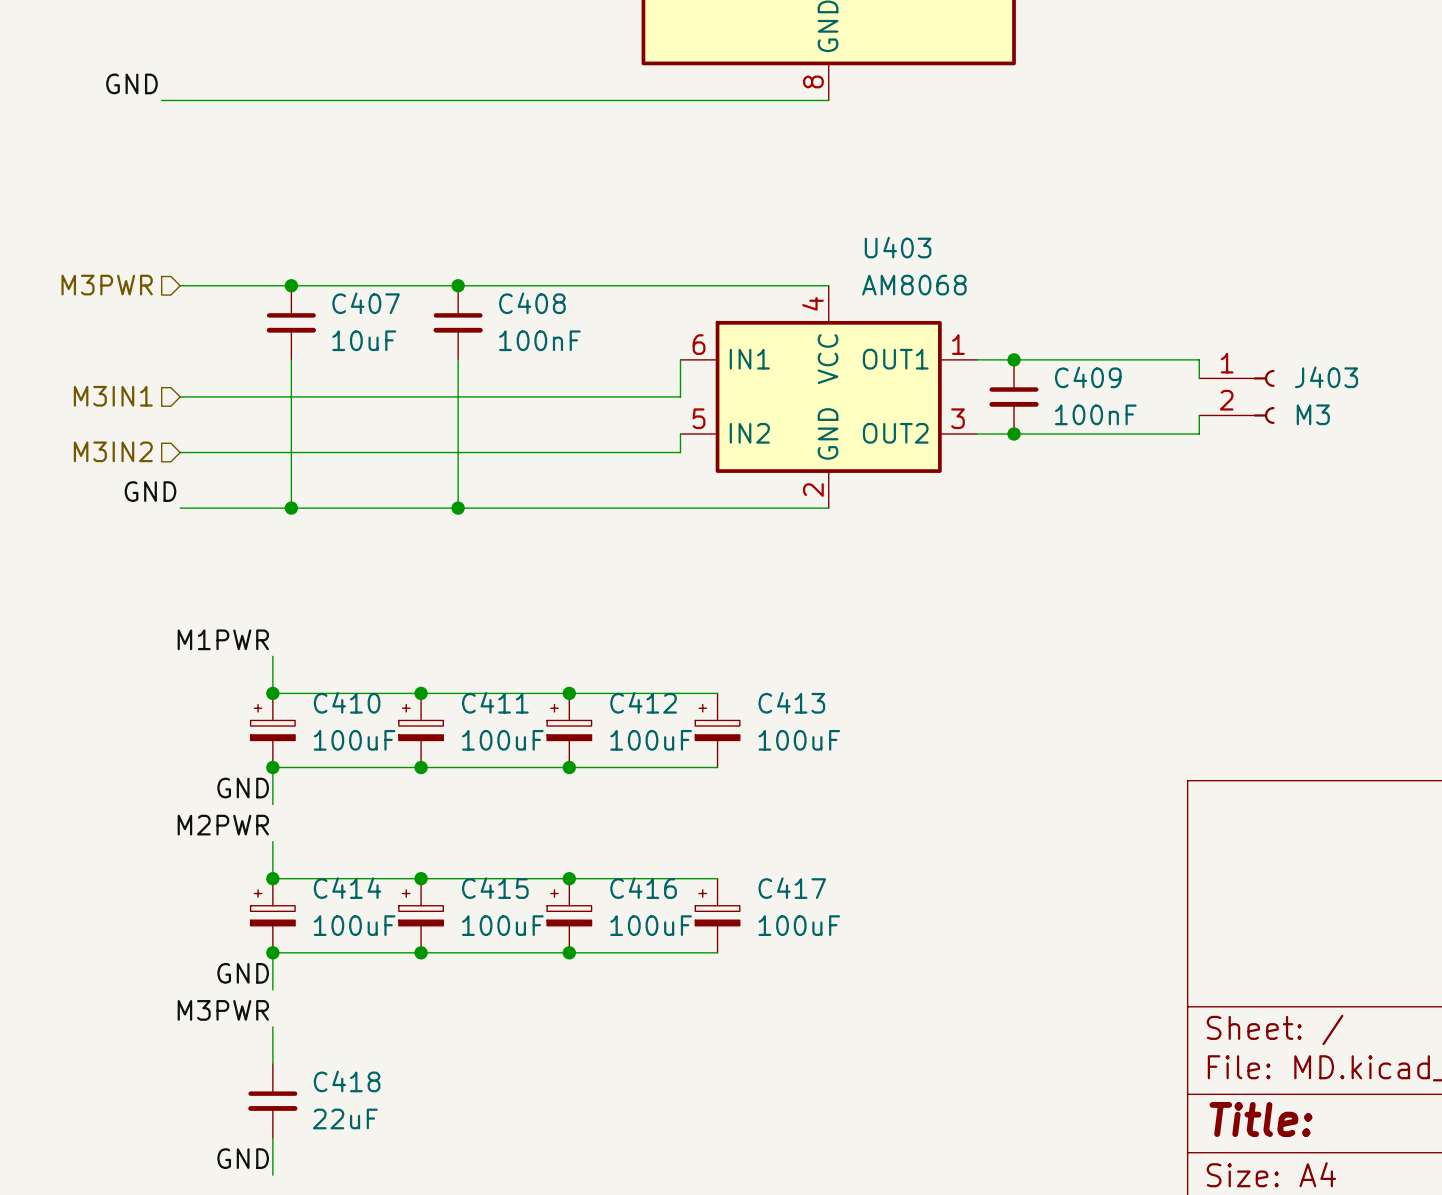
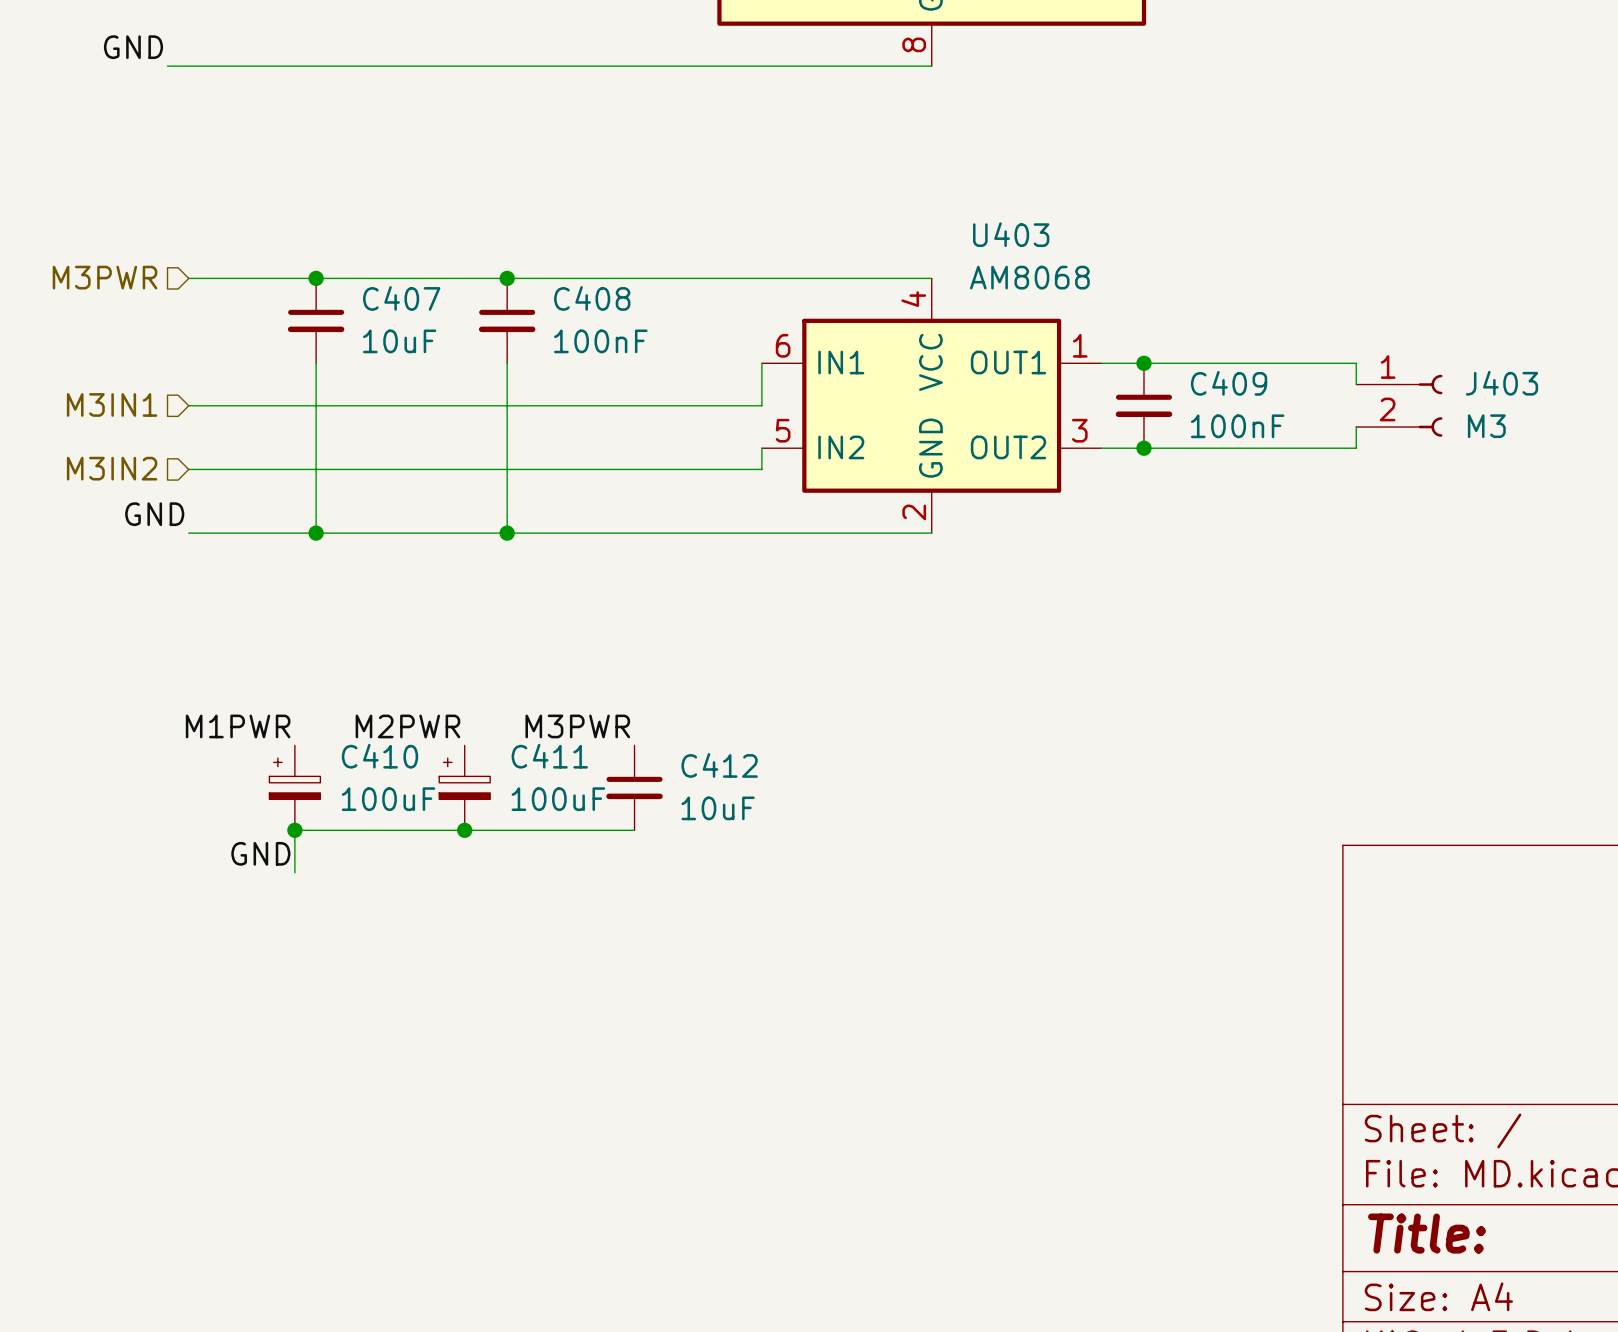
label position: M1PWR (223, 639) -> M1PWR (238, 726)
wire: (272, 656) (272, 693) (717, 693) -> none
label: none -> M3PWR (577, 726)
junction: (272, 693) -> none
junction: (421, 693) -> none
C412 symbol: [547, 693, 592, 768] -> [606, 745, 663, 831]
junction: (569, 693) -> none
C413: 100uF (717, 730) -> none
C412 value: 100uF (651, 740) -> 10uF (718, 808)
wire: (569, 767) (717, 767) -> none
junction: (569, 767) -> none
label position: M2PWR (223, 825) -> M2PWR (407, 726)
wire: (272, 841) (272, 878) (717, 878) -> none
junction: (272, 878) -> none
junction: (421, 878) -> none
junction: (569, 878) -> none
C414: 100uF (272, 915) -> none
C415: 100uF (421, 915) -> none
C416: 100uF (569, 915) -> none
C417: 100uF (717, 915) -> none
junction: (272, 952) -> none
junction: (421, 952) -> none
junction: (569, 952) -> none
wire: (717, 952) (272, 952) (272, 989) -> none
label: GND (243, 973) -> none
label: M3PWR (223, 1010) -> none
wire: (272, 1026) (272, 1063) -> none
C418: 22uF (272, 1101) -> none
wire: (272, 1138) (272, 1175) -> none
label: GND (243, 1158) -> none

